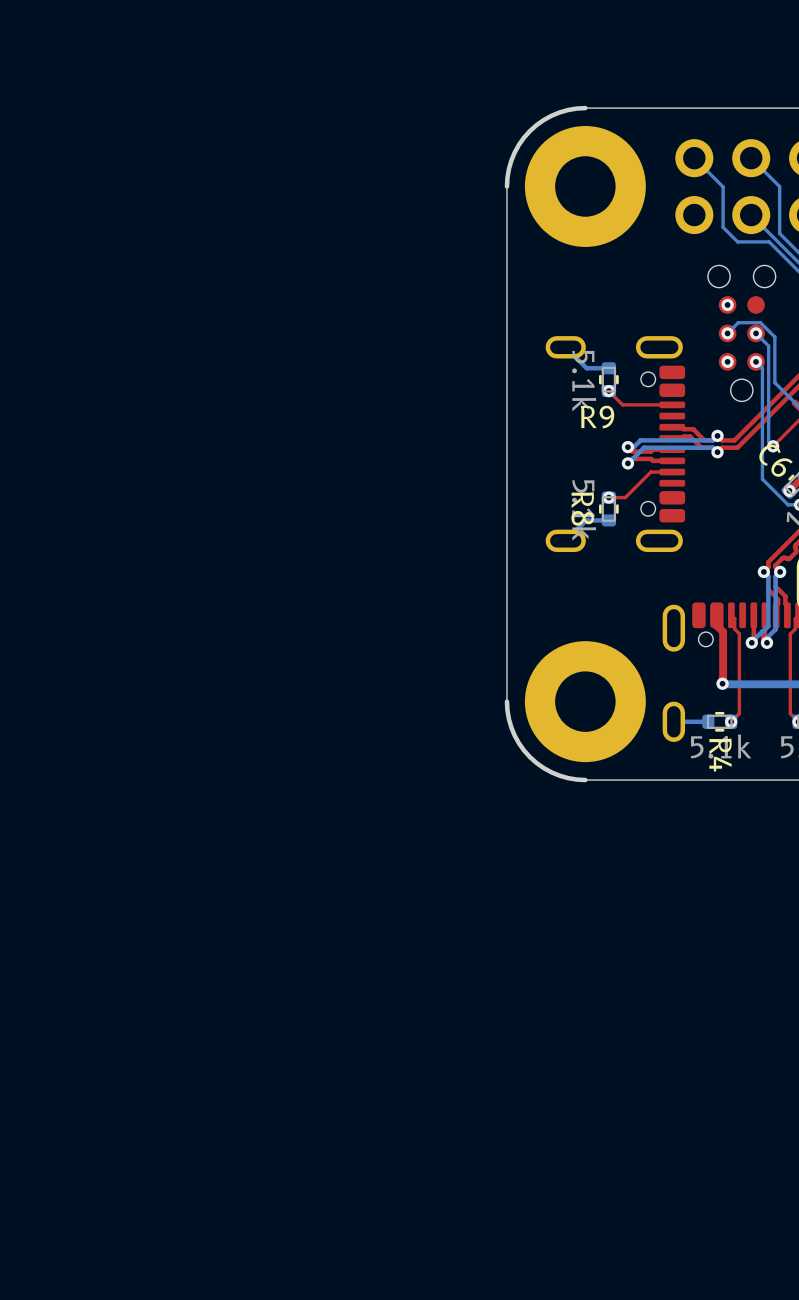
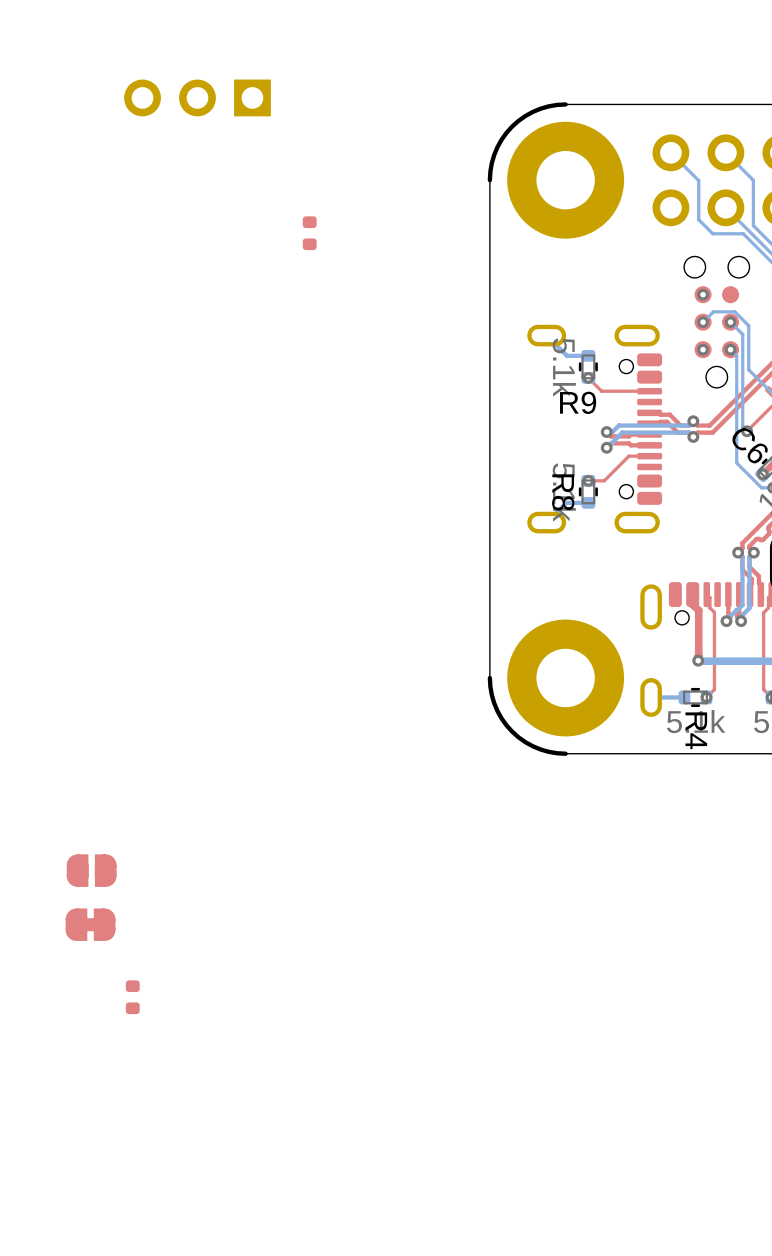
part: none -> (197, 97)
part: none -> (309, 233)
part: none -> (91, 870)
part: none -> (90, 924)
part: none -> (132, 997)

